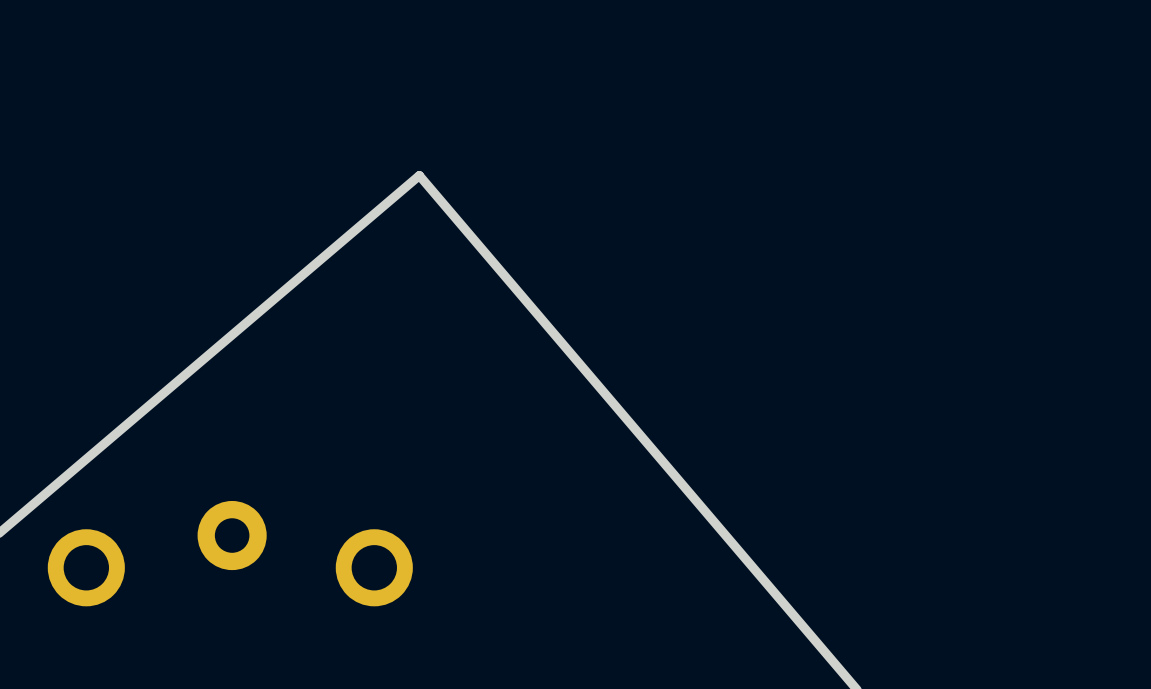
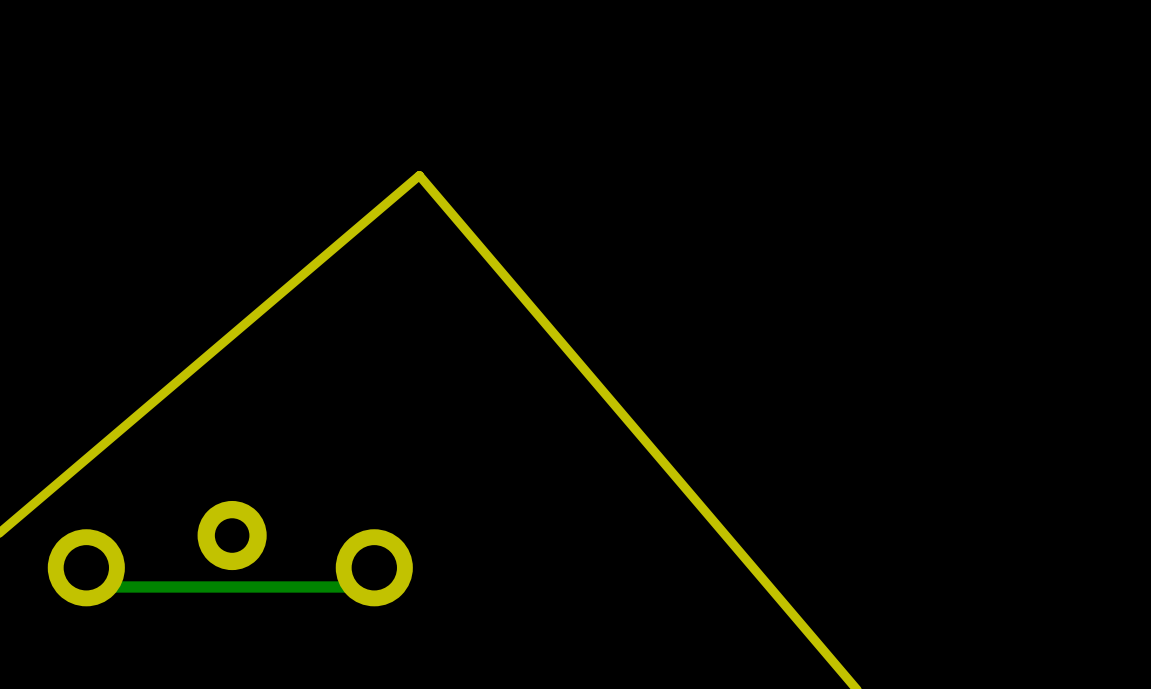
track: none -> (374, 567) (355, 586) (105, 586) (86, 567)

